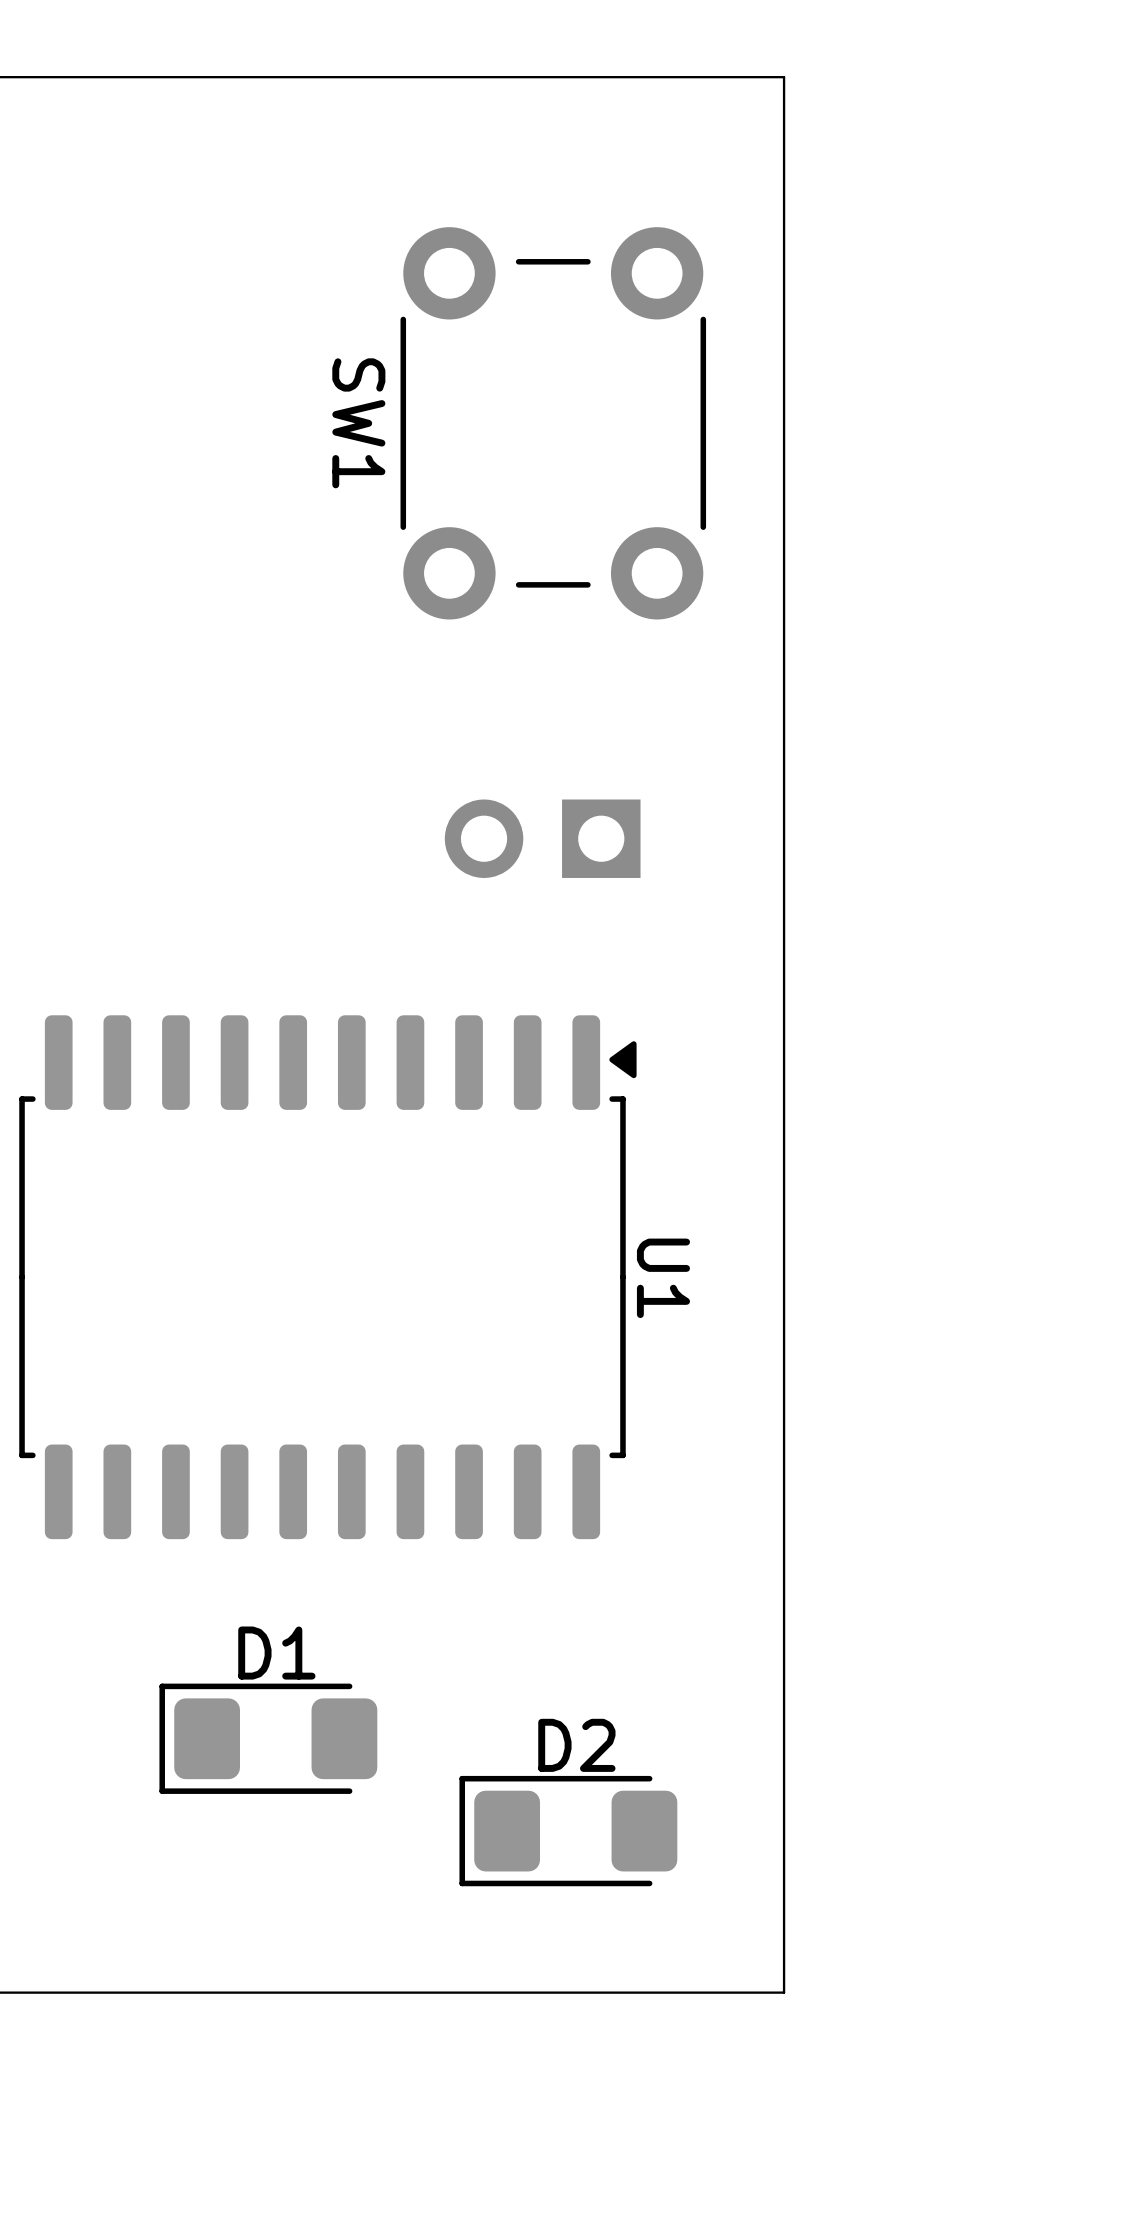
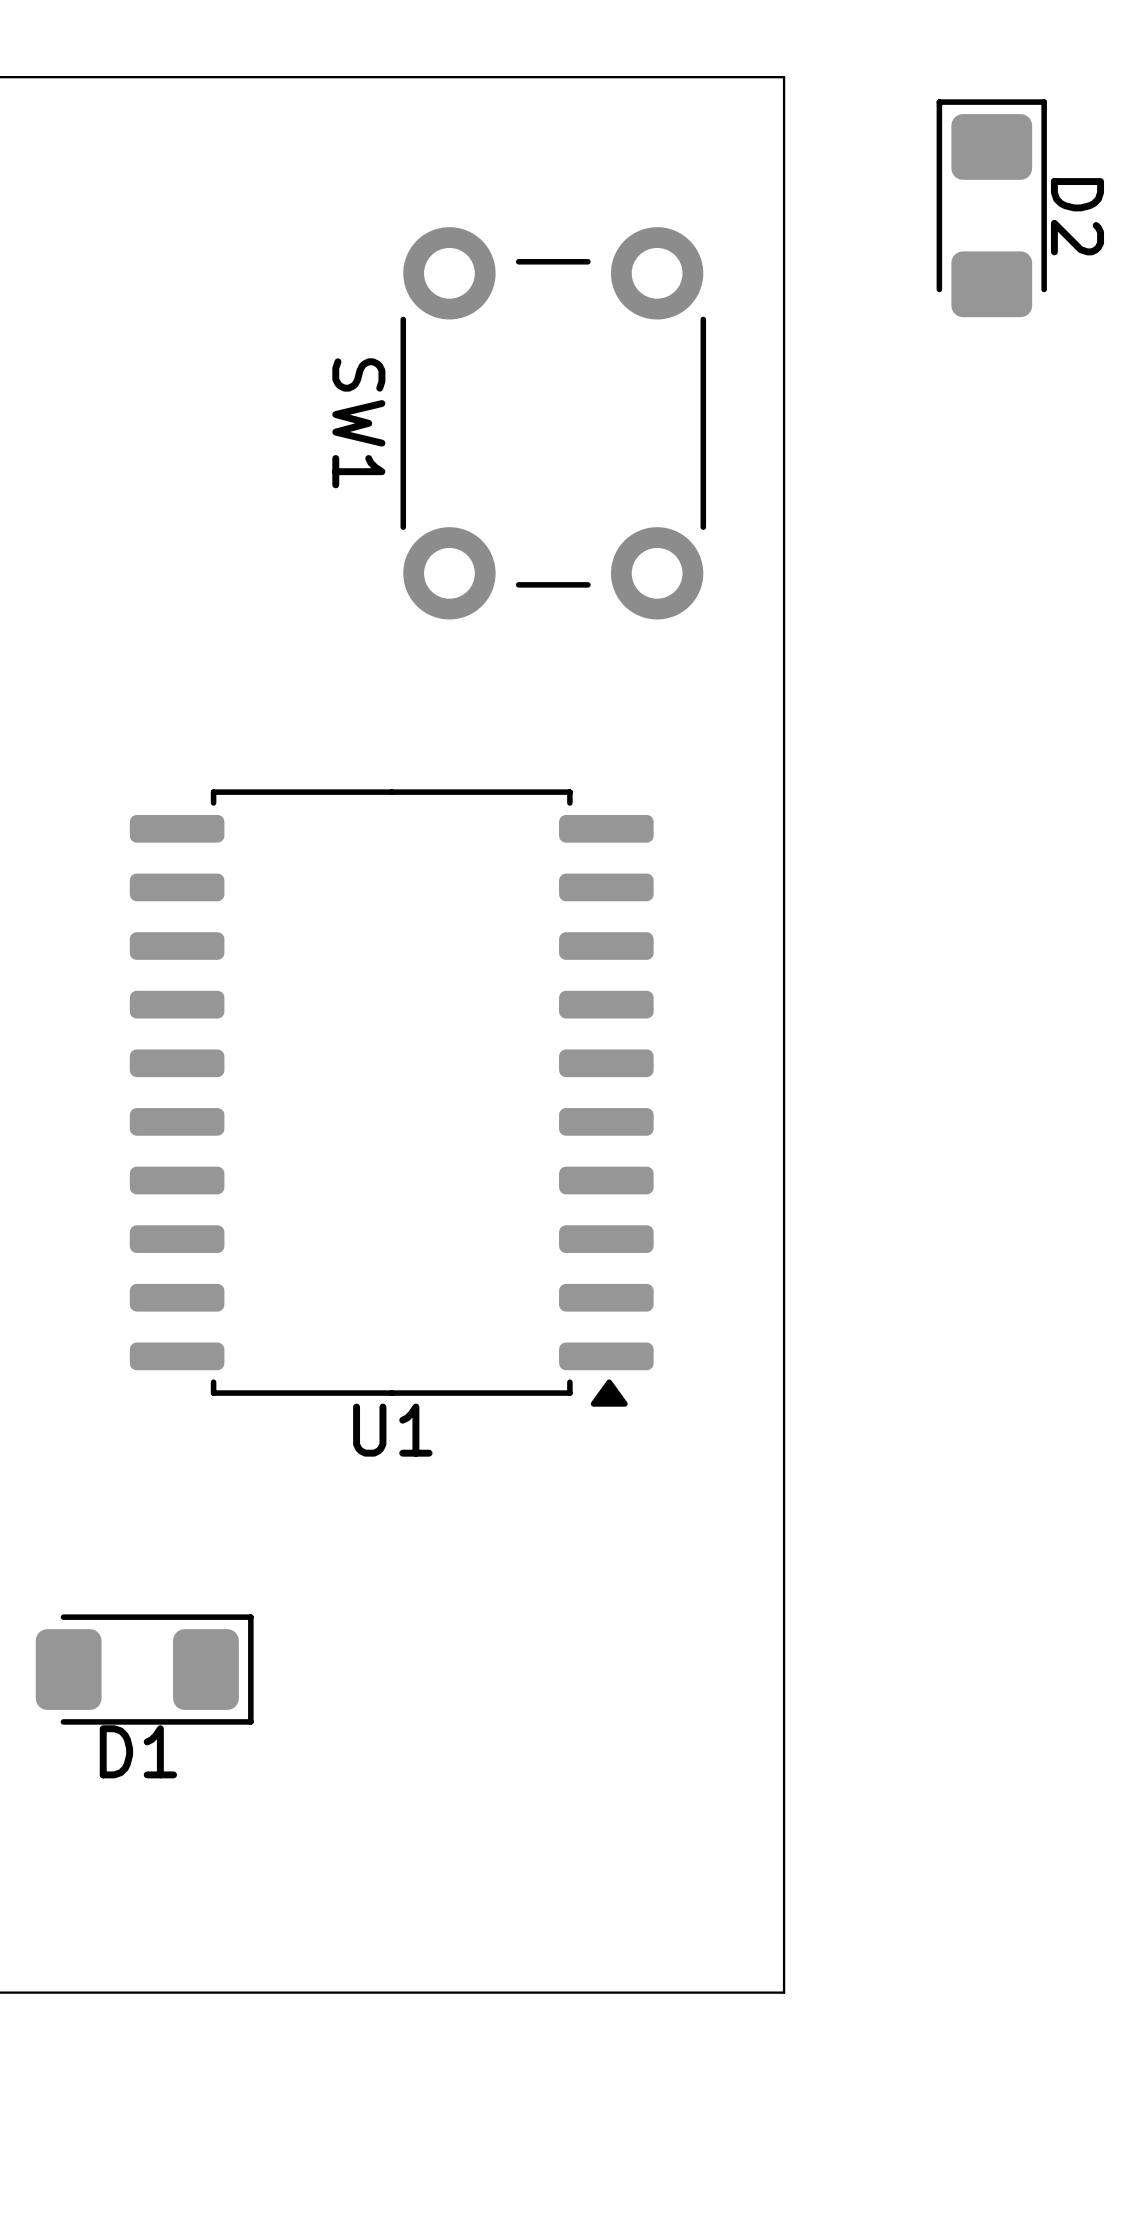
part: (542, 838) -> none
U1 rotation: 0° (327, 1277) -> 90° clockwise (391, 1098)
D1 rotation: 0° (268, 1738) -> 180° (144, 1669)
D1 position: (268, 1738) -> (144, 1669)
D2 rotation: 0° (568, 1831) -> 90° clockwise (991, 208)
D2 position: (568, 1831) -> (991, 208)

